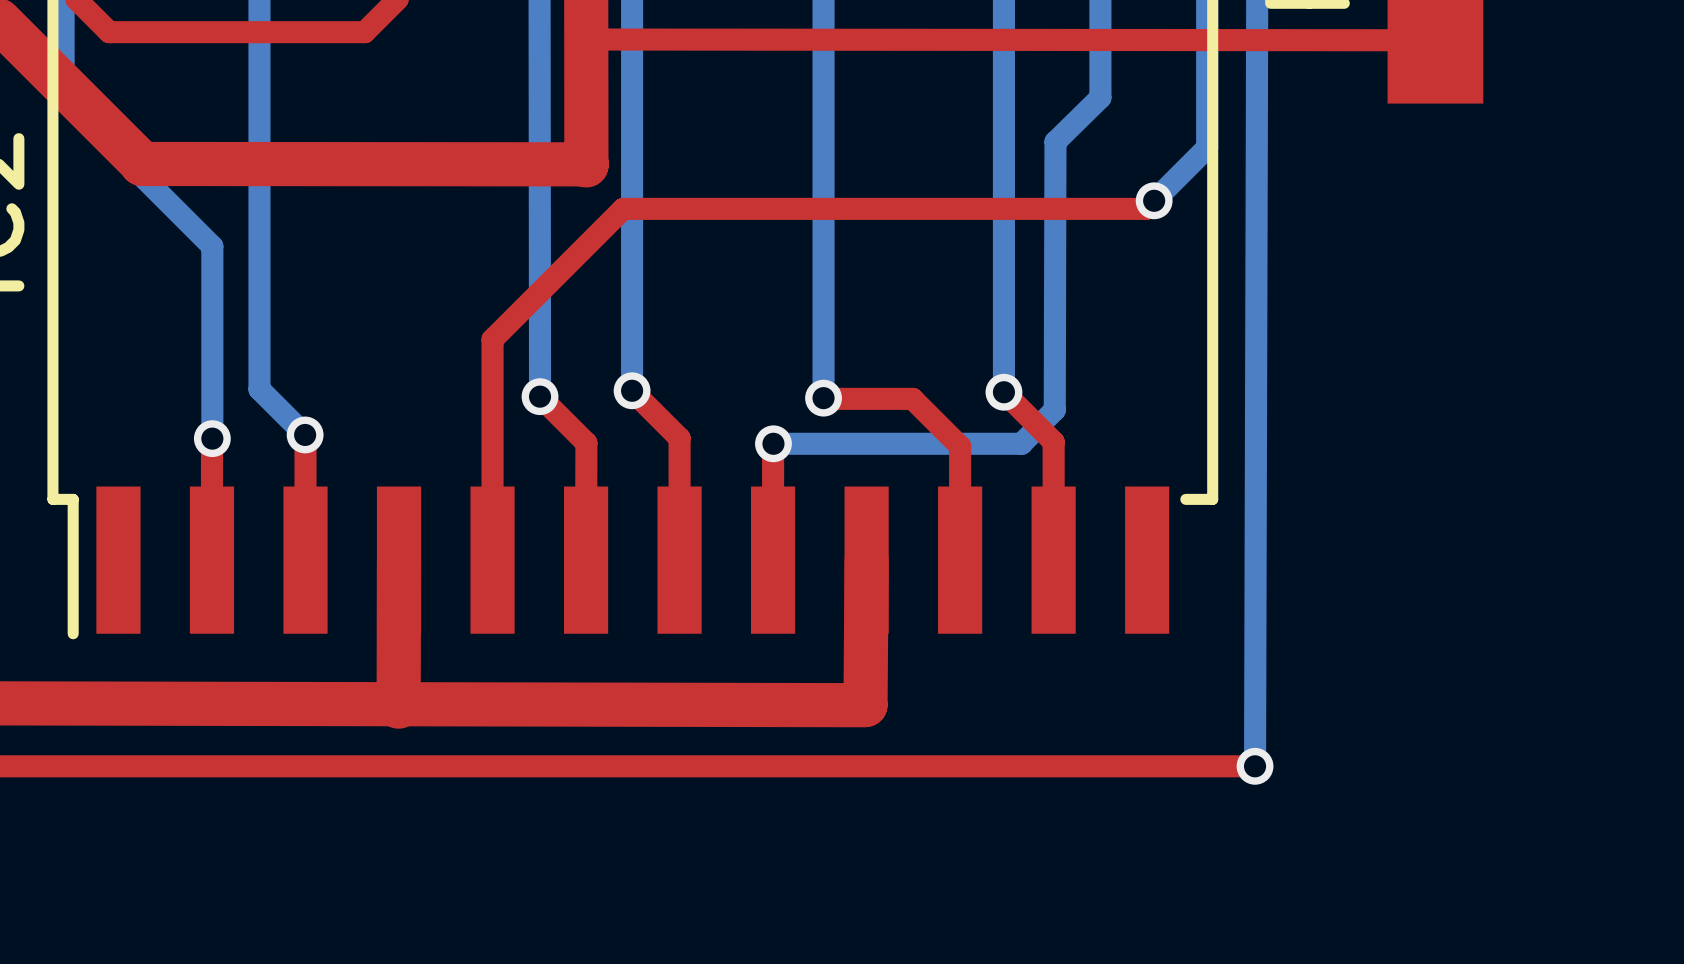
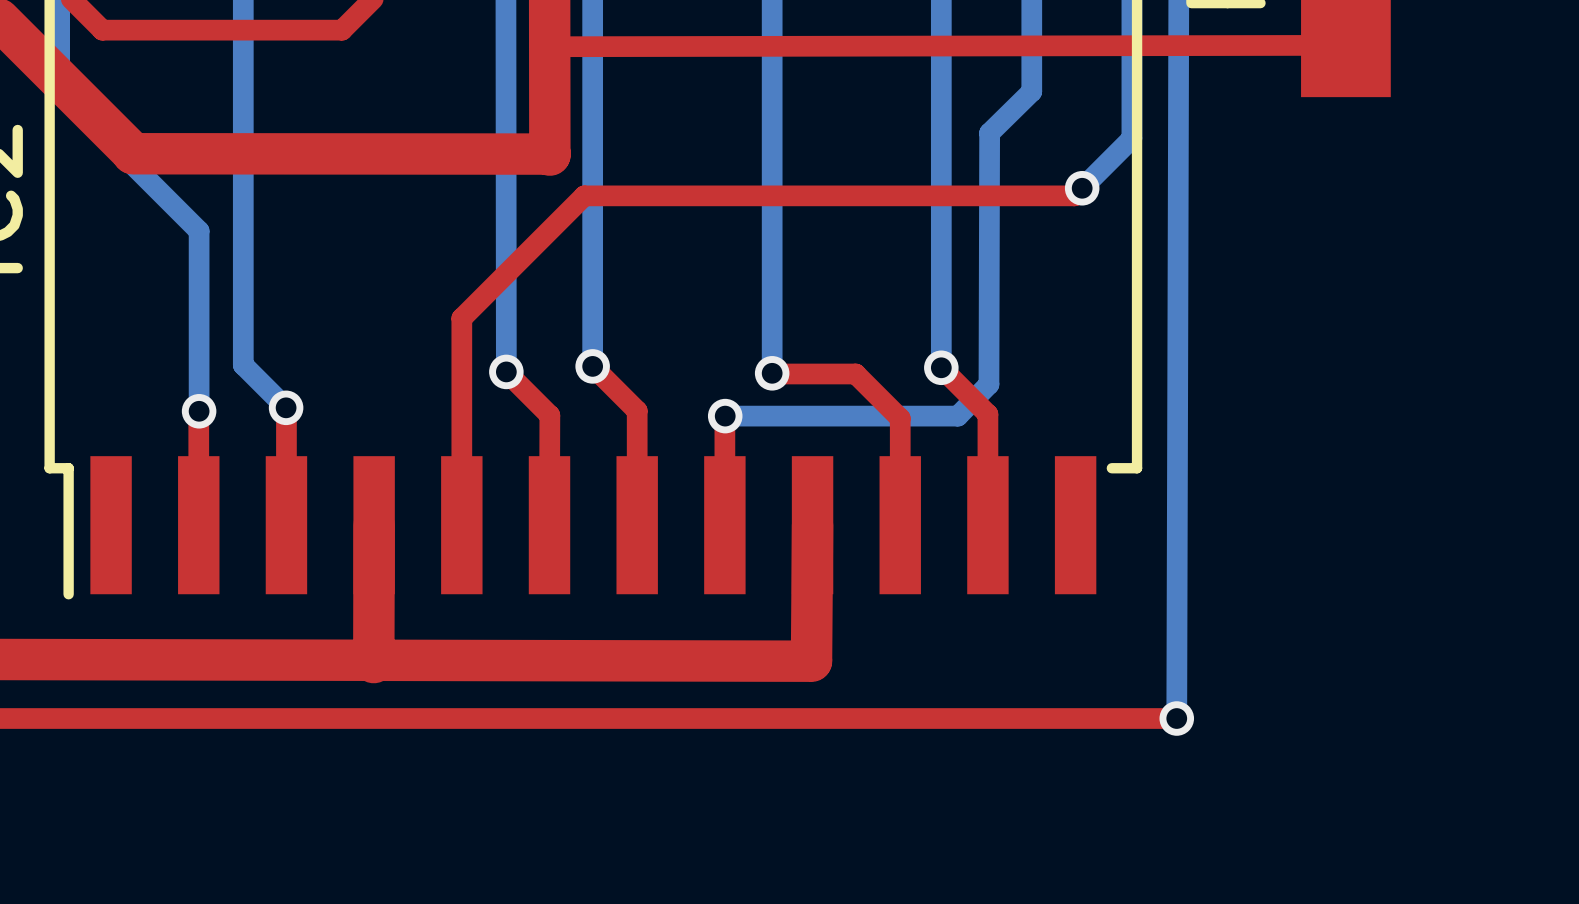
top track: (590, 39) (1427, 40) -> none
top track: none -> (1345, 45) (549, 46)

